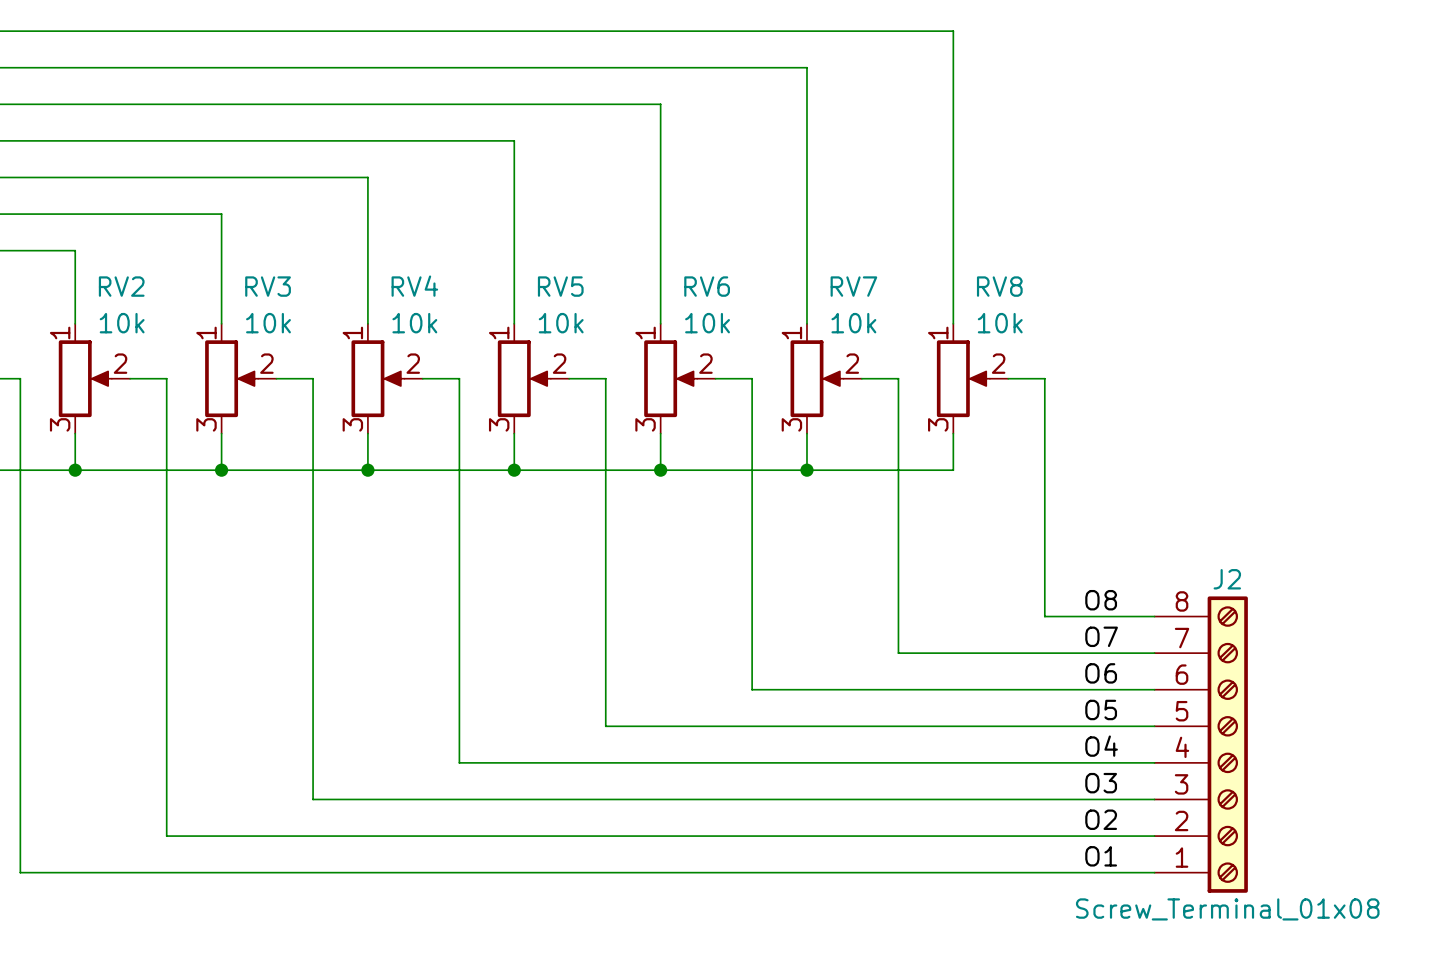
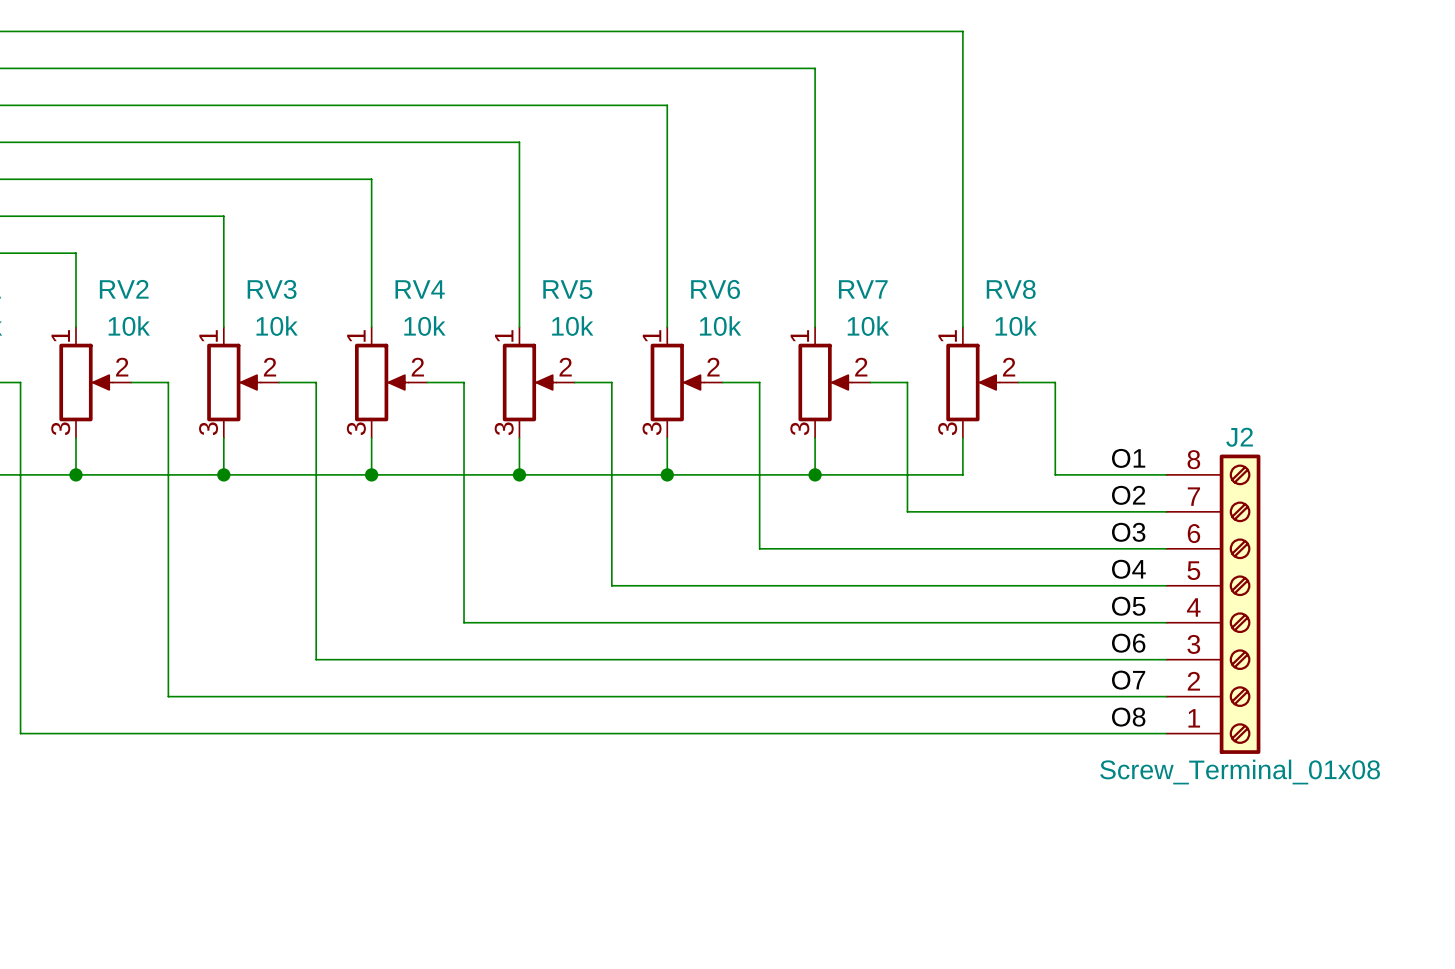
label: none -> O1 (1128, 458)
wire: (1044, 470) (1044, 616) -> (1055, 474) (1166, 474)
wire: (898, 506) (898, 653) -> (907, 511) (1166, 511)
wire: (752, 543) (752, 689) -> (759, 548) (1166, 548)
wire: (605, 579) (605, 726) -> (611, 585) (1166, 585)
label position: O8 (1101, 600) -> O8 (1128, 717)
wire: (459, 616) (459, 762) (1154, 762) -> (464, 622) (1055, 622)
label position: O7 (1101, 636) -> O7 (1128, 680)
wire: (313, 653) (313, 799) (1154, 799) -> (316, 659) (907, 659)
label position: O6 (1101, 673) -> O6 (1128, 643)
wire: (166, 689) (166, 836) (1154, 836) -> (168, 696) (759, 696)
label position: O5 (1101, 709) -> O5 (1128, 606)
wire: (20, 726) (20, 872) (1154, 872) -> (20, 733) (611, 733)
J2 position: (1201, 744) -> (1213, 604)
label position: O4 (1101, 746) -> O4 (1128, 569)
label position: O3 (1101, 783) -> O3 (1128, 532)
label position: O2 (1101, 819) -> O2 (1128, 495)
label: O1 (1101, 856) -> none

